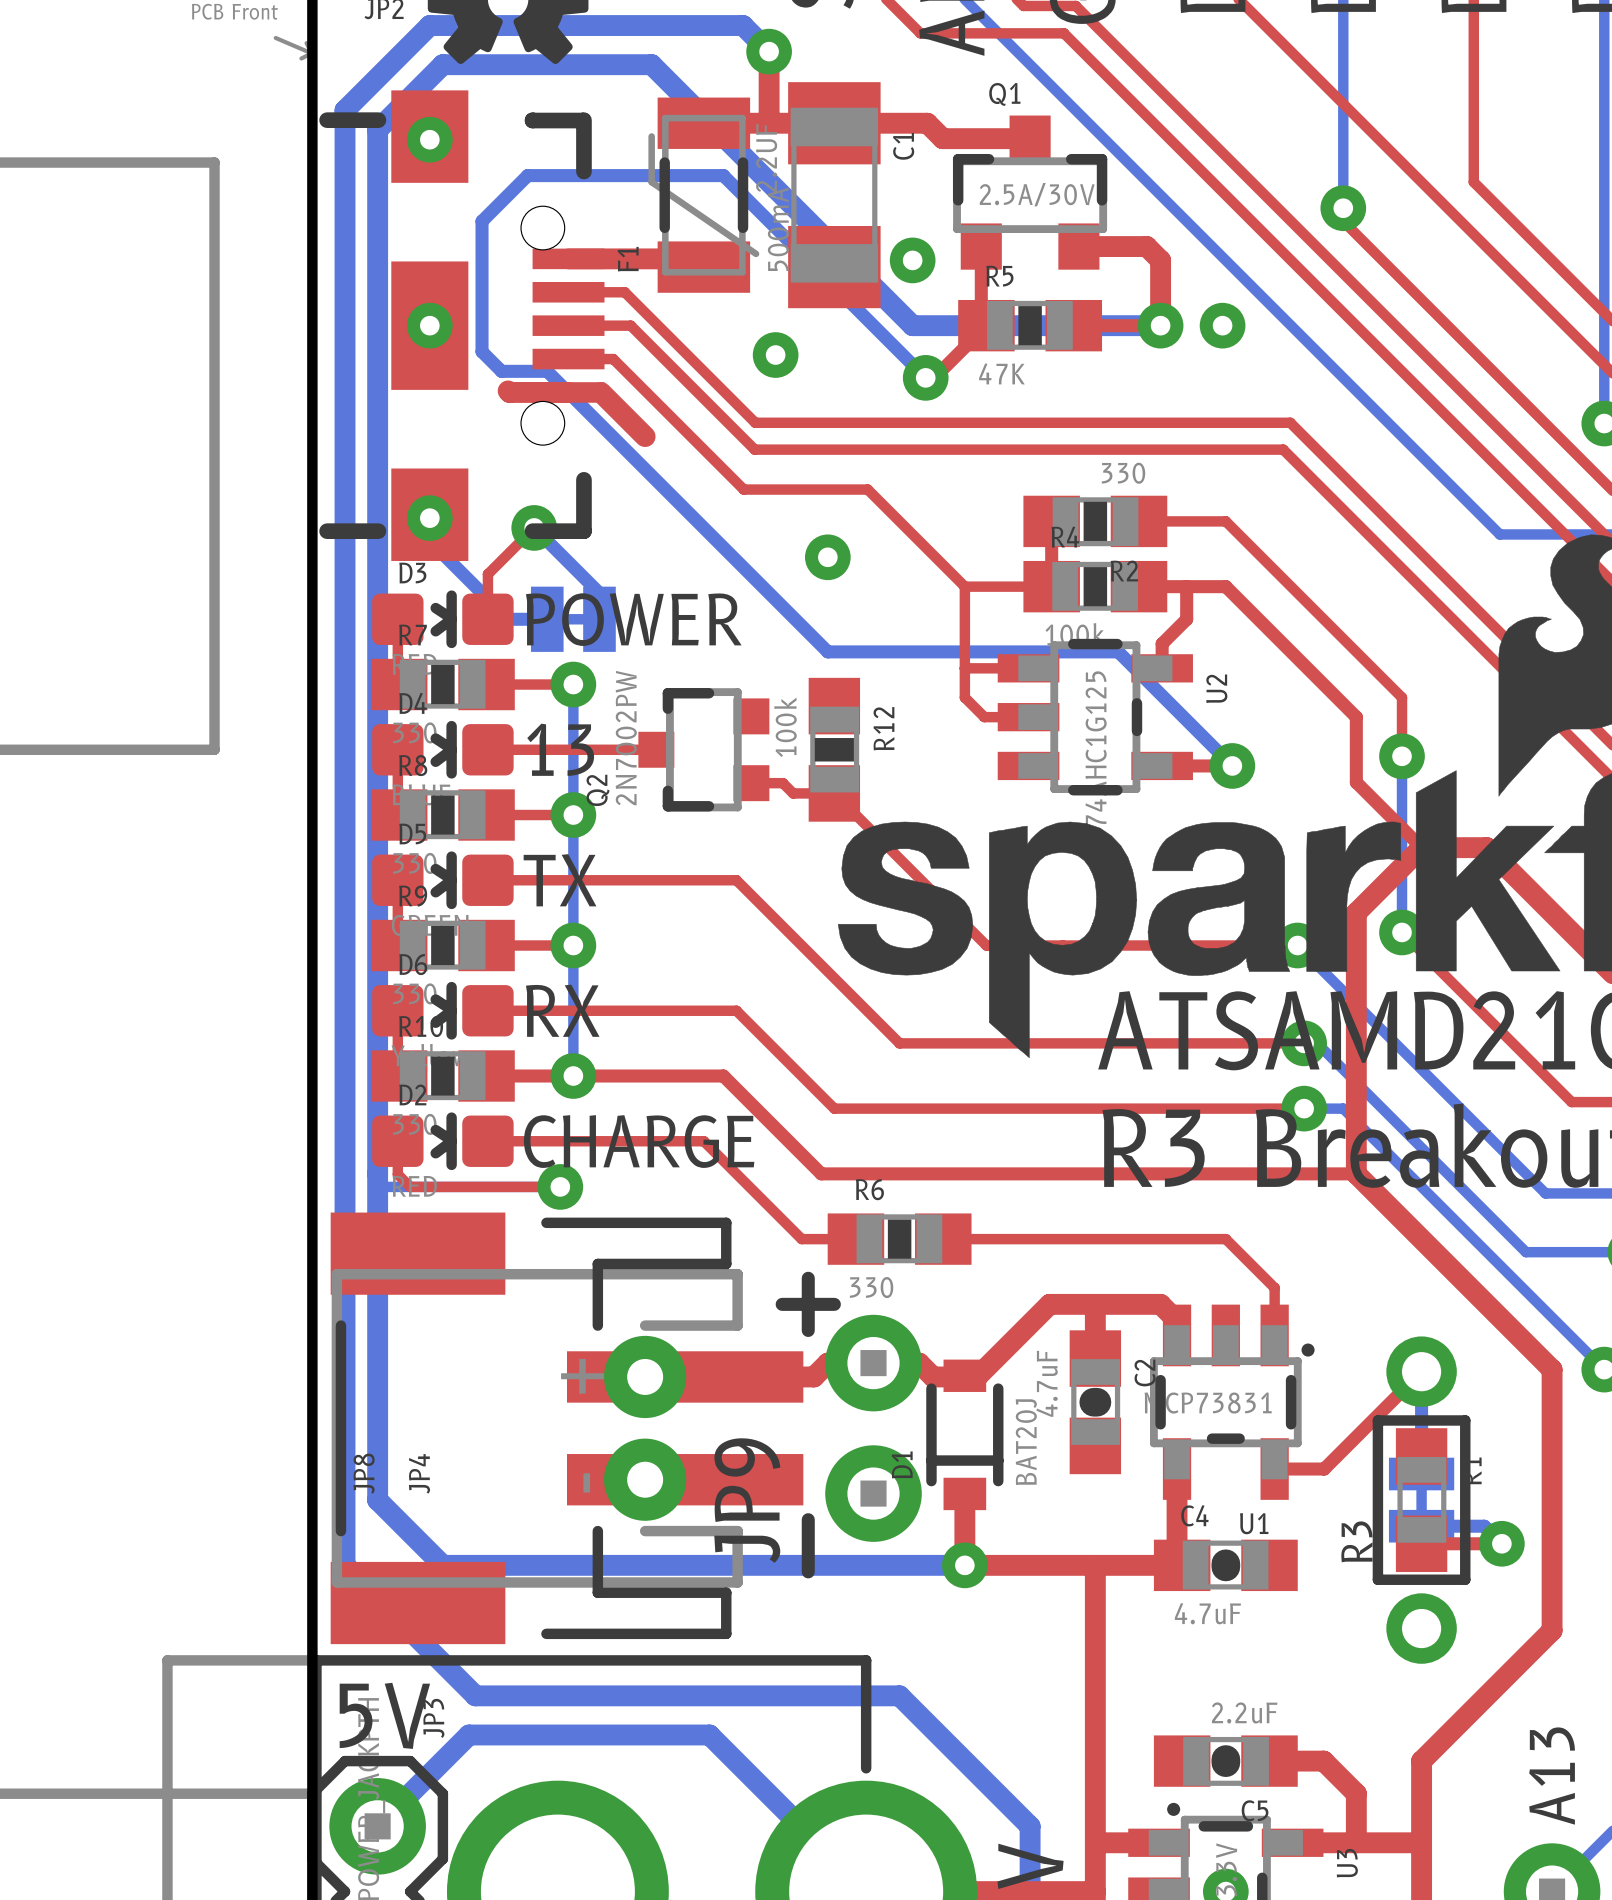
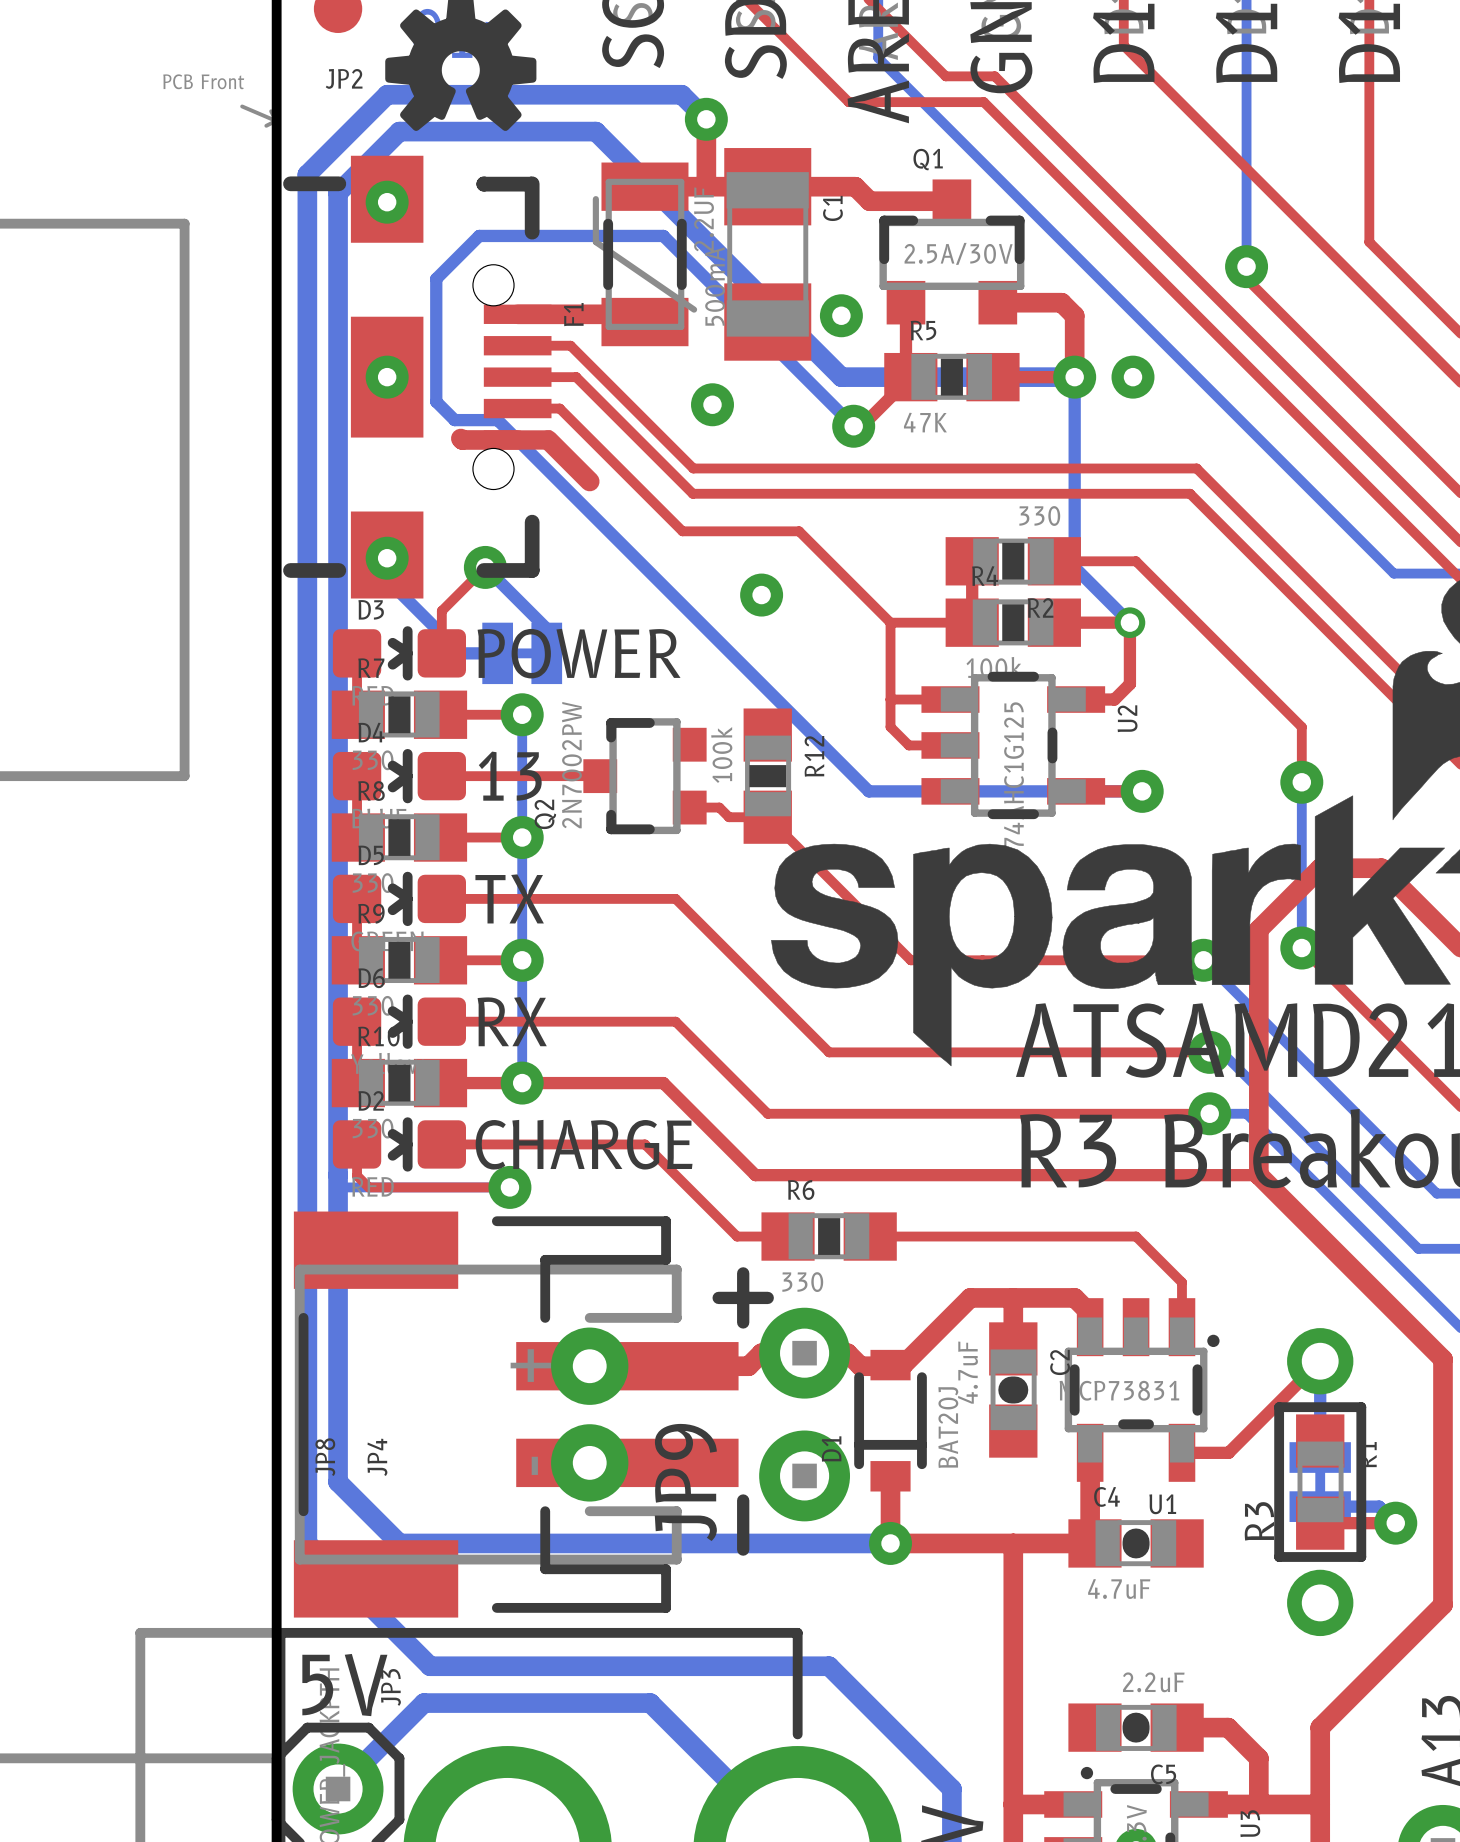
bottom track: none -> (1074, 377) (1074, 567) (1129, 622)
top track: (1186, 586) (1186, 619) (1162, 643) (1162, 668) -> (1129, 622) (1129, 684) (1114, 699) (1076, 699)
top track: (1219, 586) (1225, 586) (1356, 717) (1356, 782) (1421, 847) -> none
via: none -> (1129, 622)
bottom track: (827, 651) (1118, 651) (1232, 765) -> (761, 684) (868, 791) (1142, 791)

